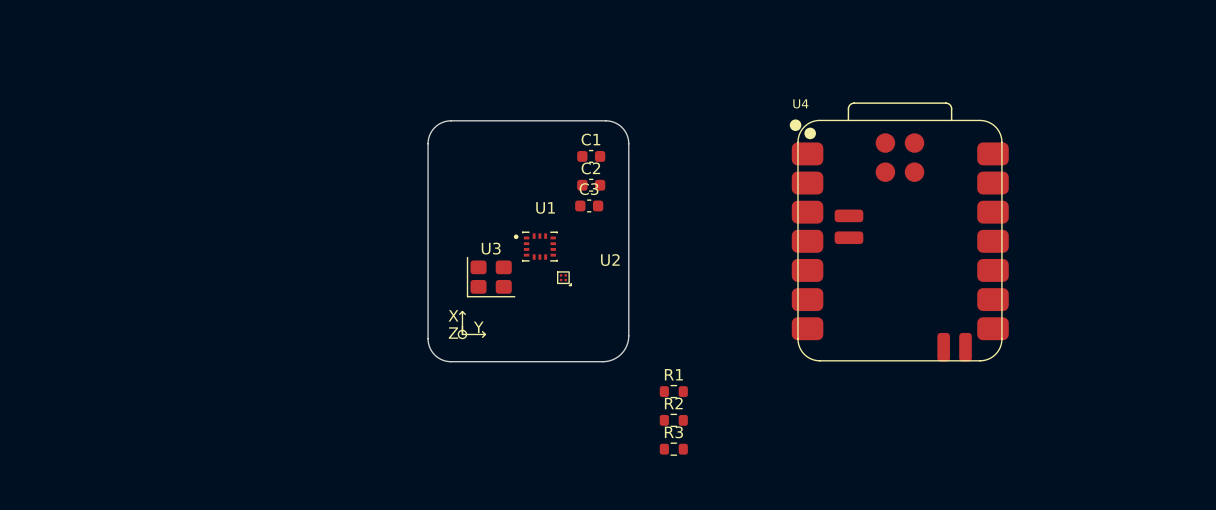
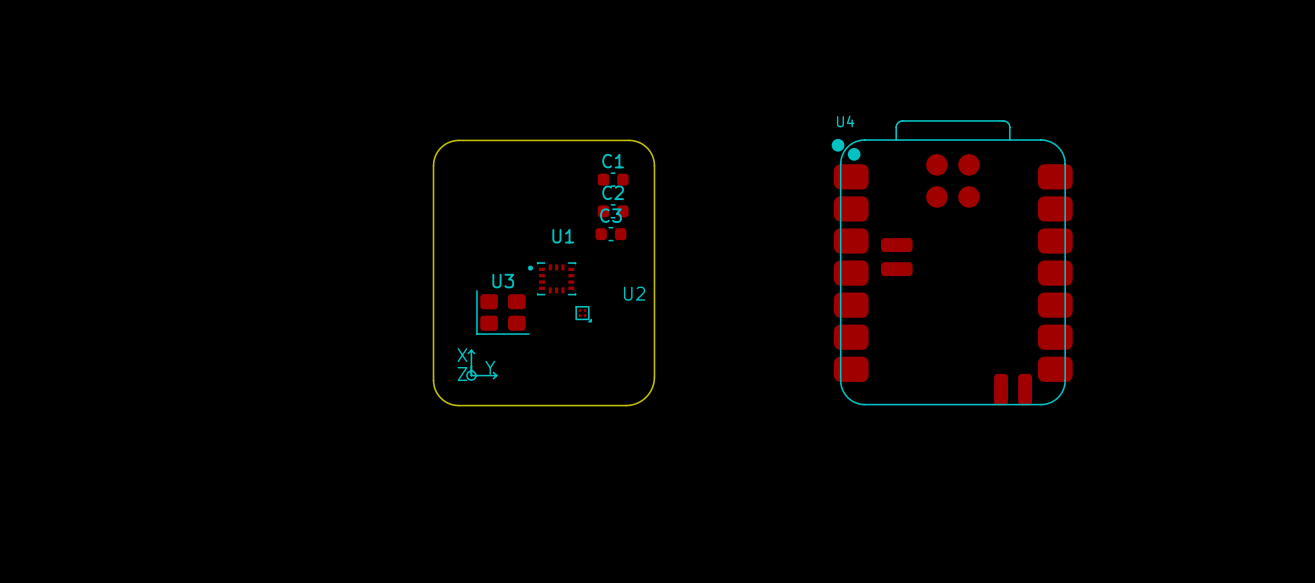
R1: (673, 391) -> none
R2: (673, 420) -> none
R3: (673, 449) -> none

